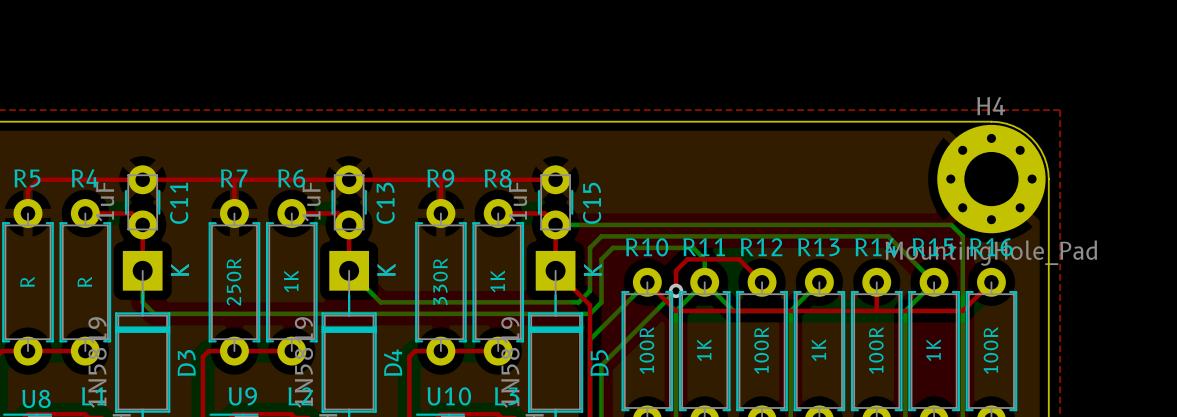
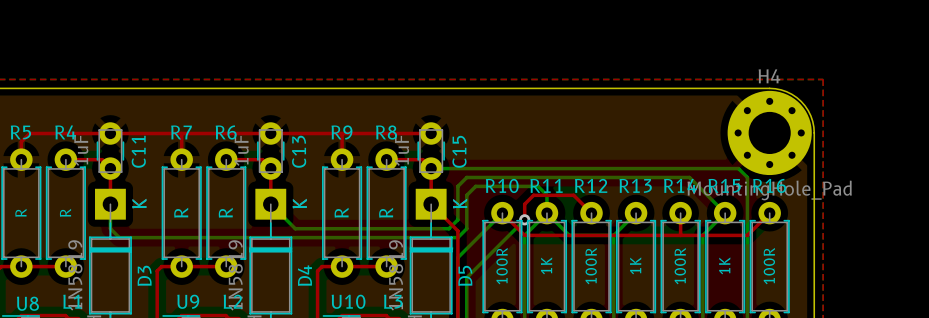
R7 value: 250R (234, 281) -> R (181, 212)
R6 value: 1K (291, 281) -> R (225, 212)
R9 value: 330R (440, 281) -> R (341, 212)
R8 value: 1K (497, 281) -> R (386, 212)

